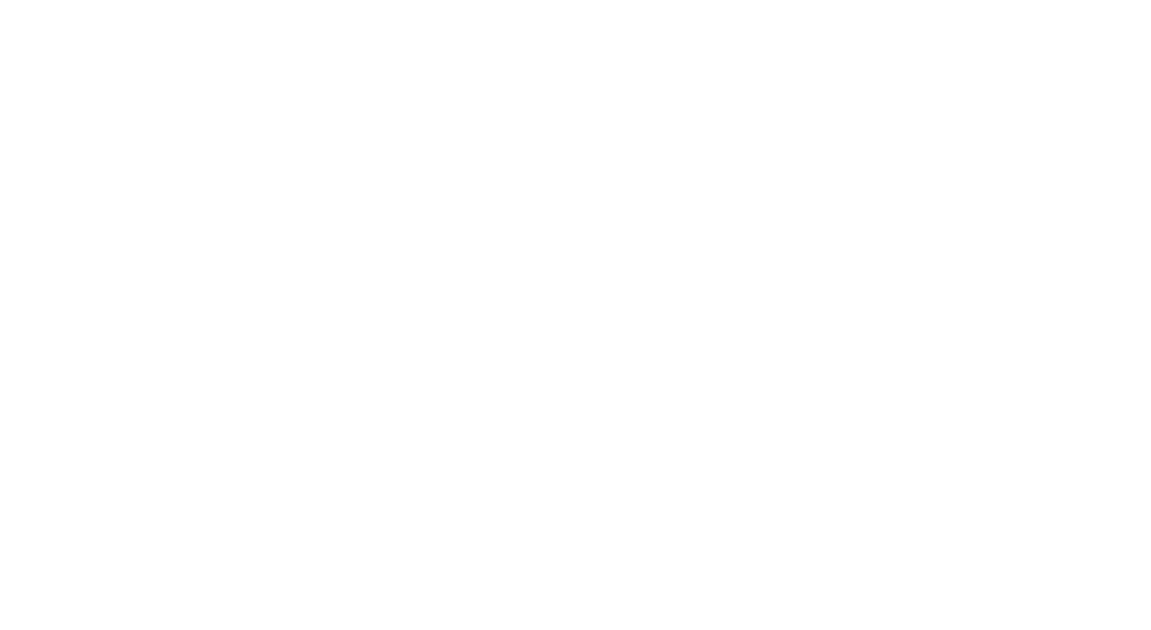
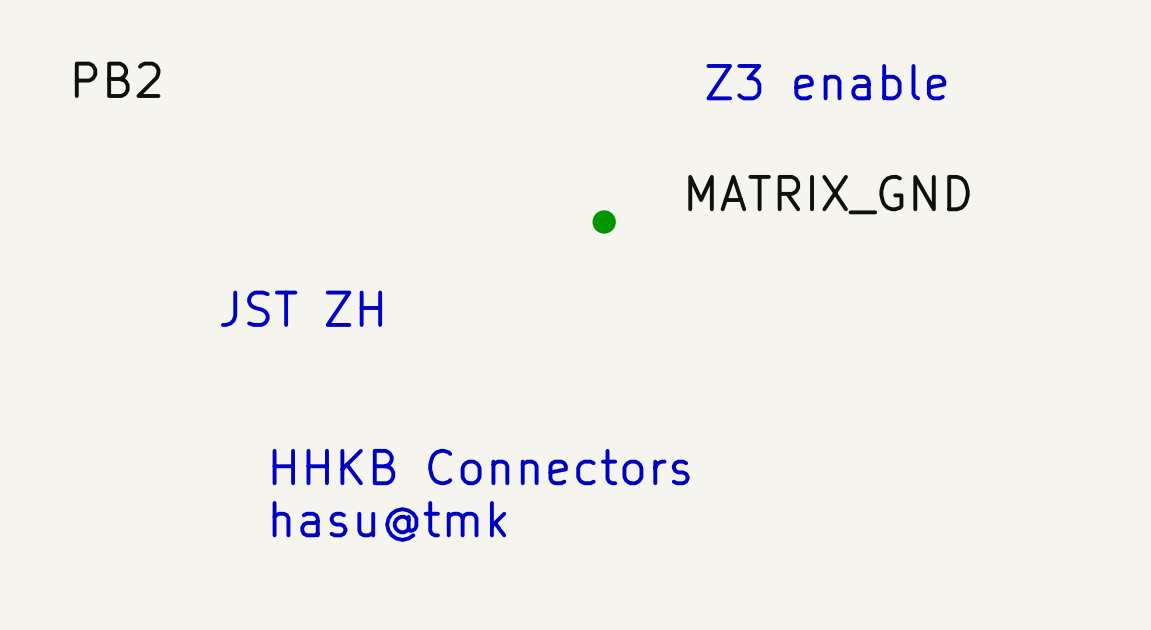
label: none -> PB2 (117, 79)
text: none -> Z3 enable (826, 82)
label: none -> MATRIX_GND (828, 194)
junction: none -> (604, 221)
text: none -> JST ZH (301, 308)
text: none -> HHKB Connectors (481, 467)
text: none -> hasu@tmk (389, 521)

